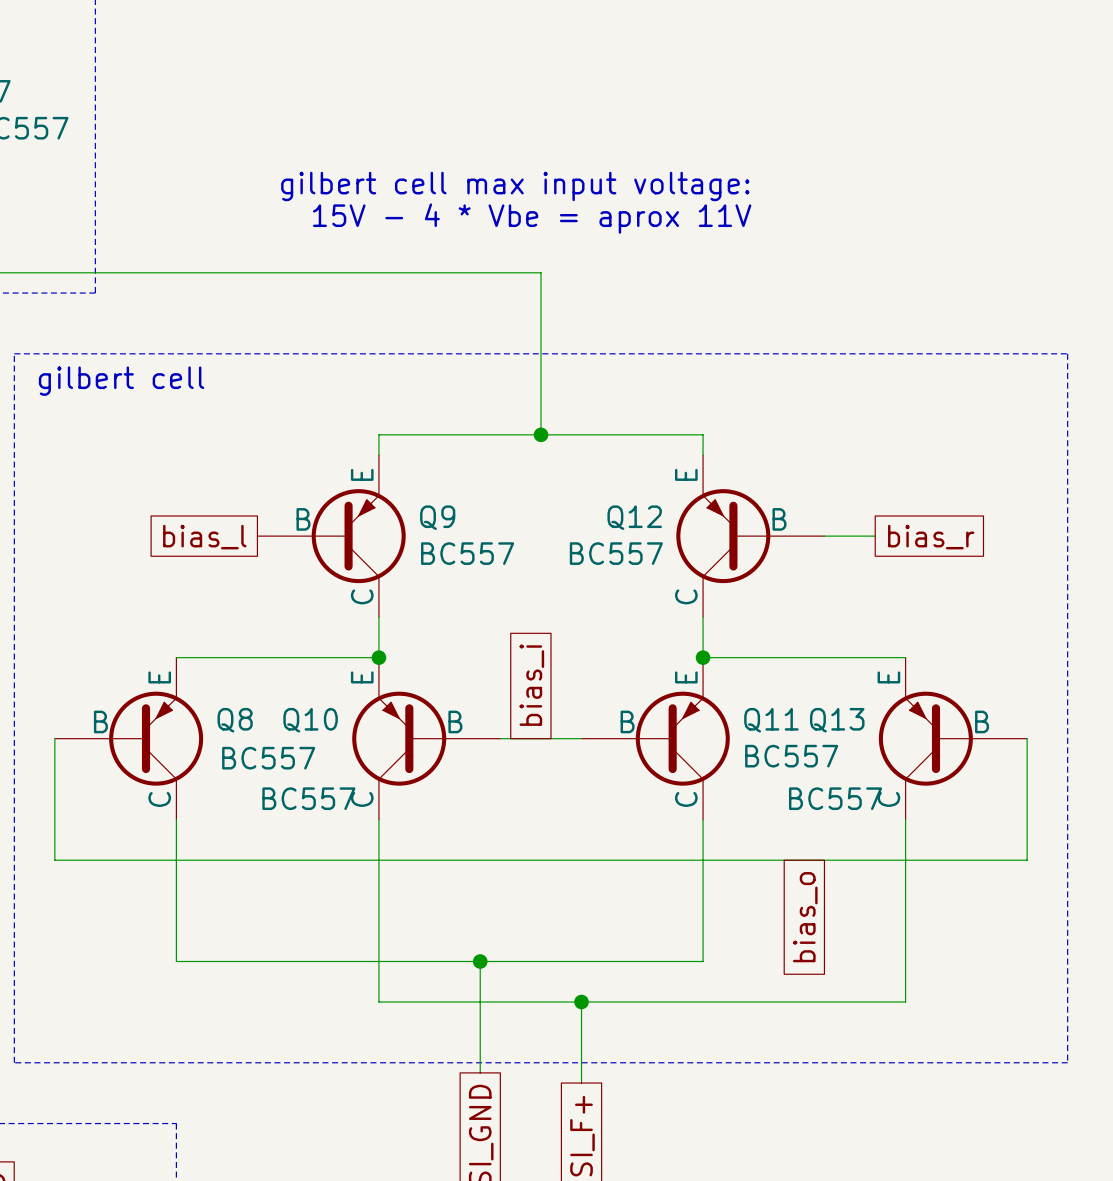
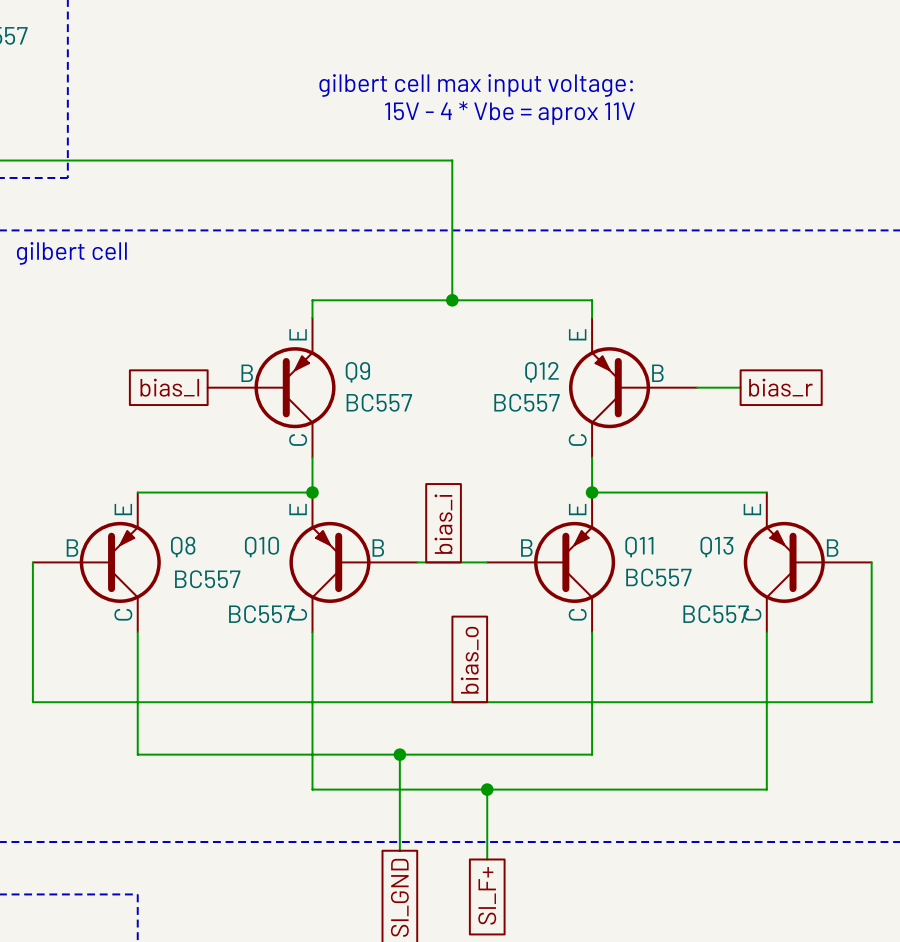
wire: (54, 860) (1027, 860) -> (32, 667) (32, 702) (871, 702) (871, 667)
global label rotation: 0° (805, 917) -> 180° (469, 660)
global label position: bias_o (805, 917) -> bias_o (469, 660)

